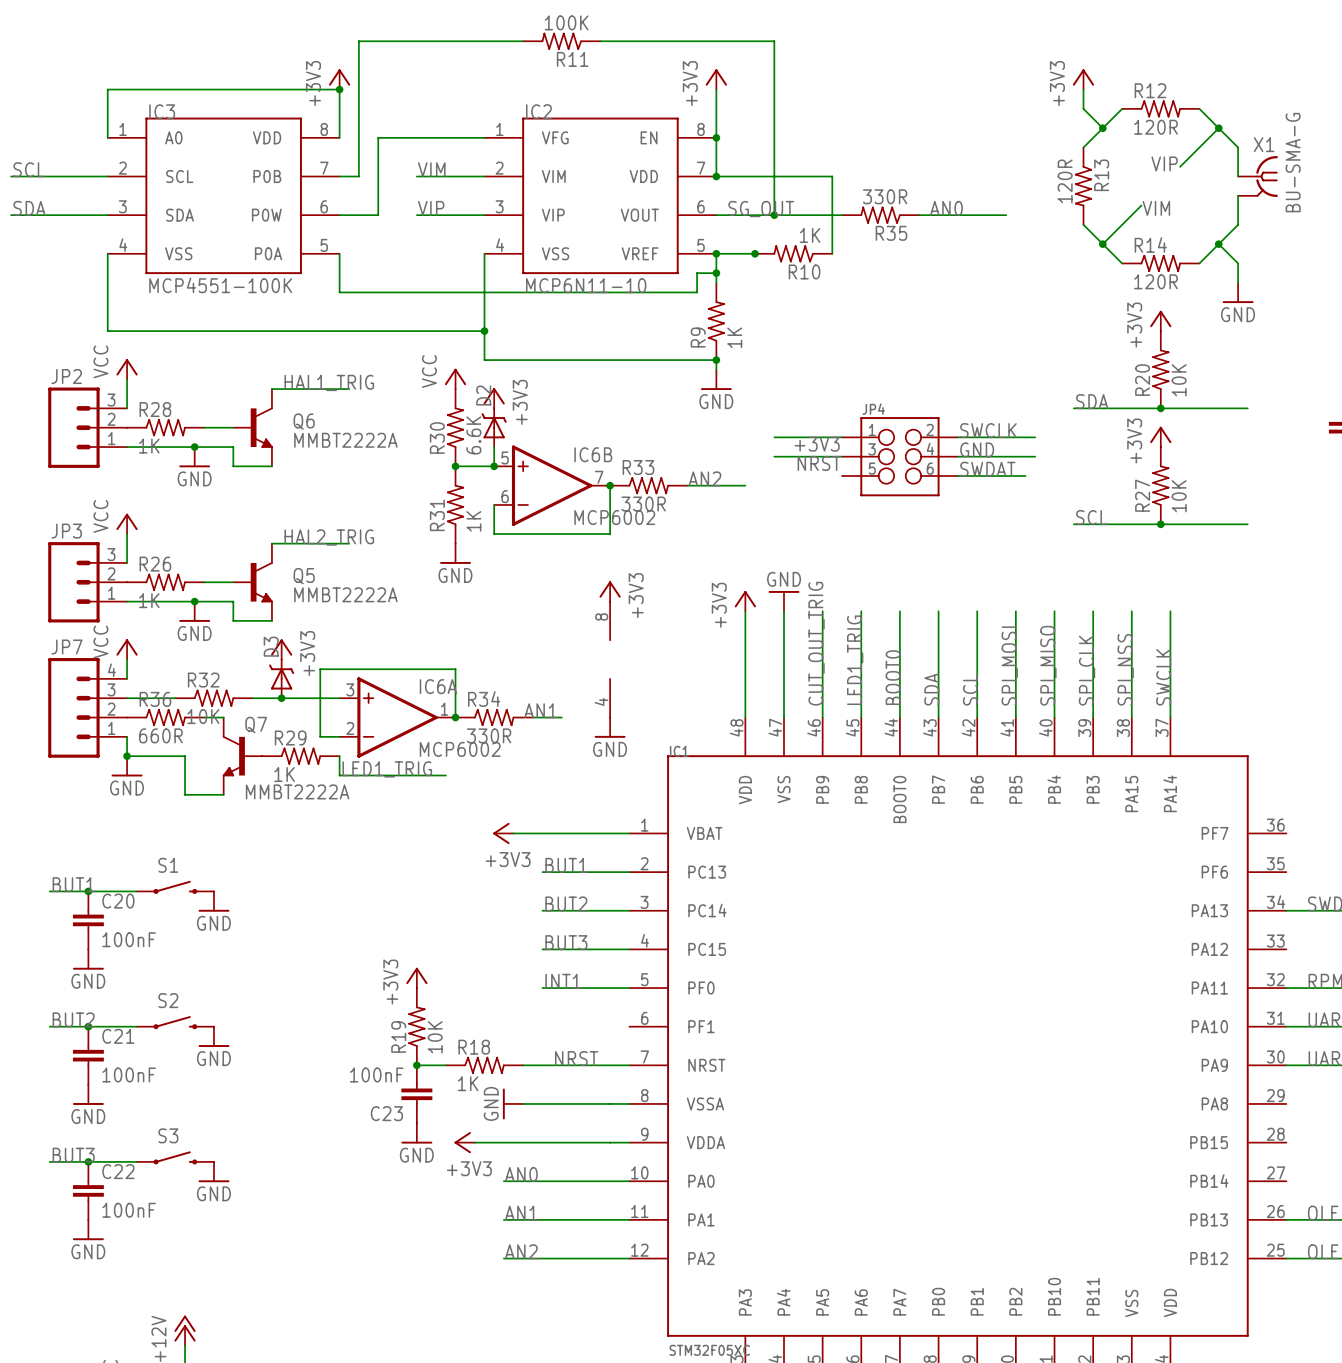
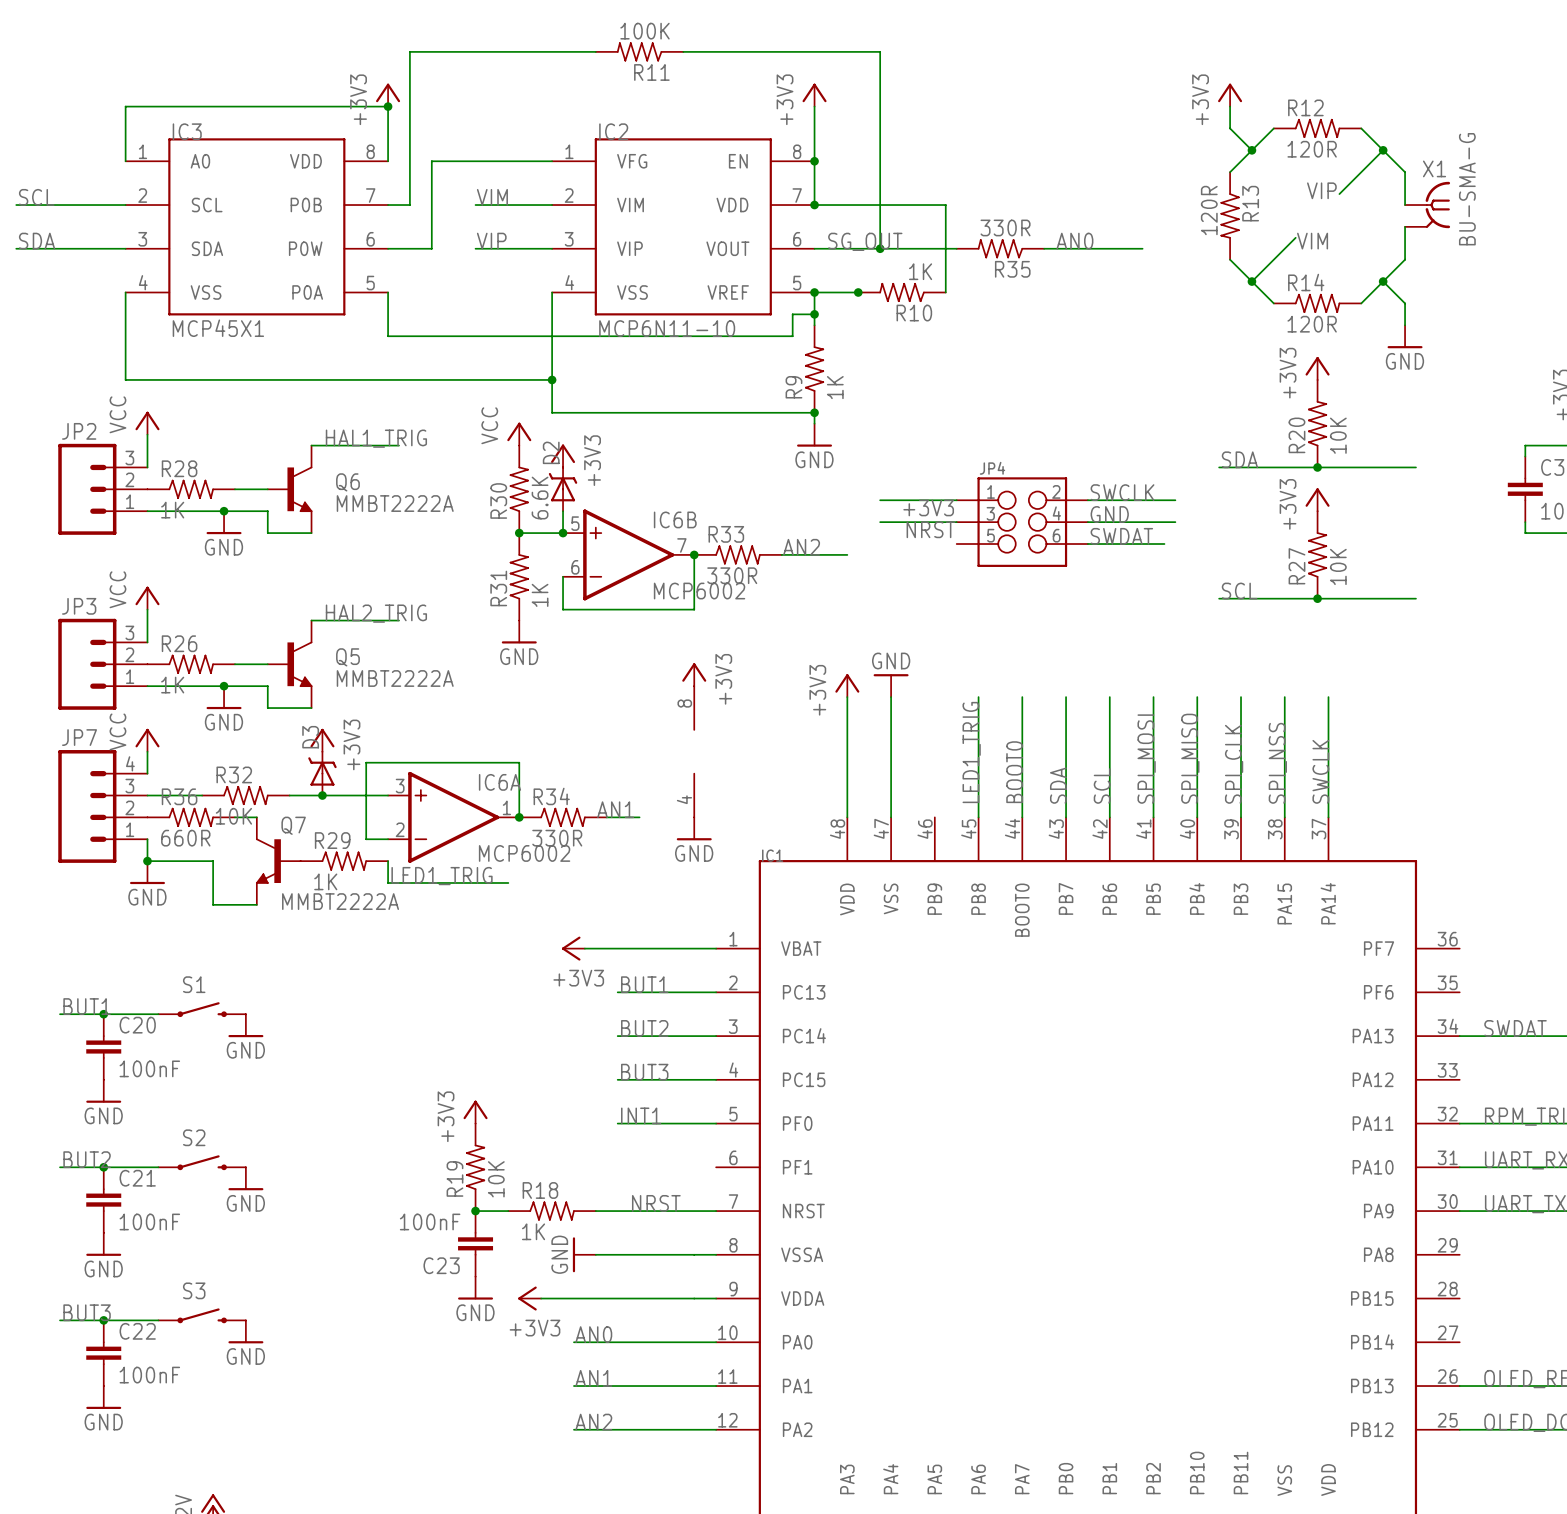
IC3 value: MCP4551-100K (220, 285) -> MCP45X1 (218, 328)
wire: (822, 611) (822, 717) -> none
label: CUT_OUT_TRIG (816, 643) -> none

